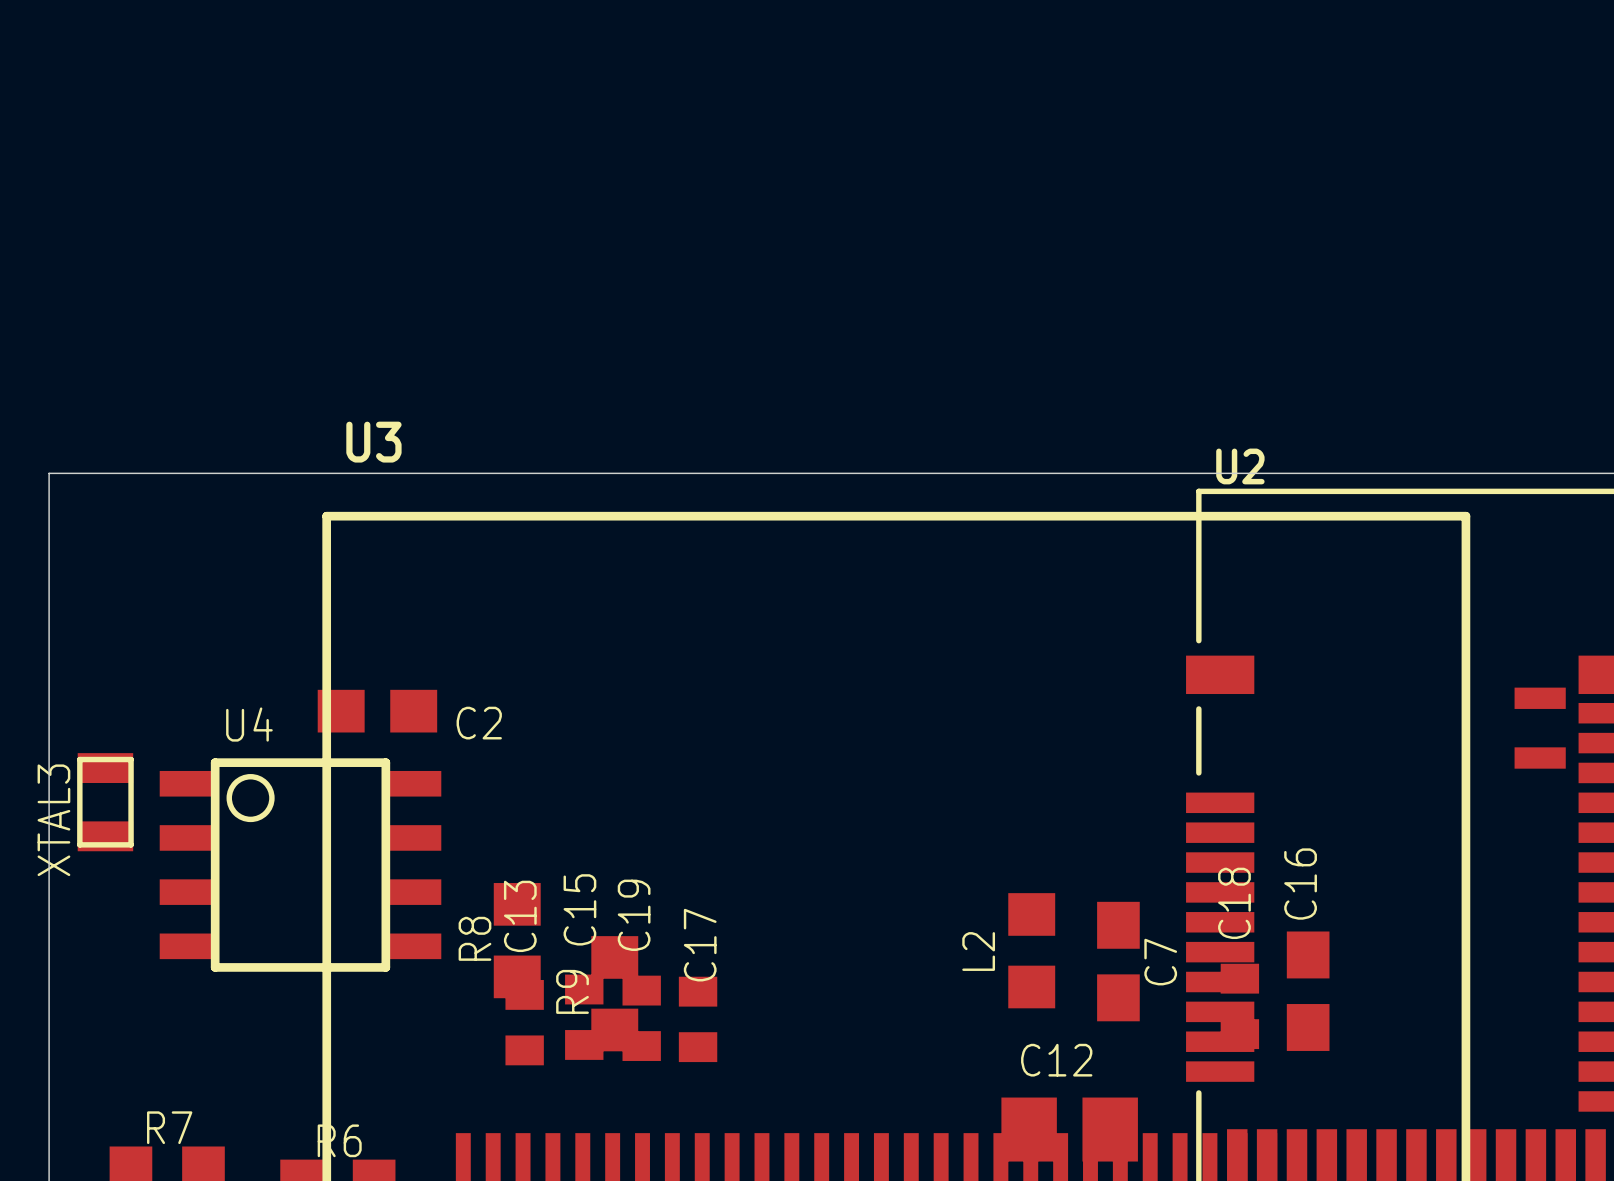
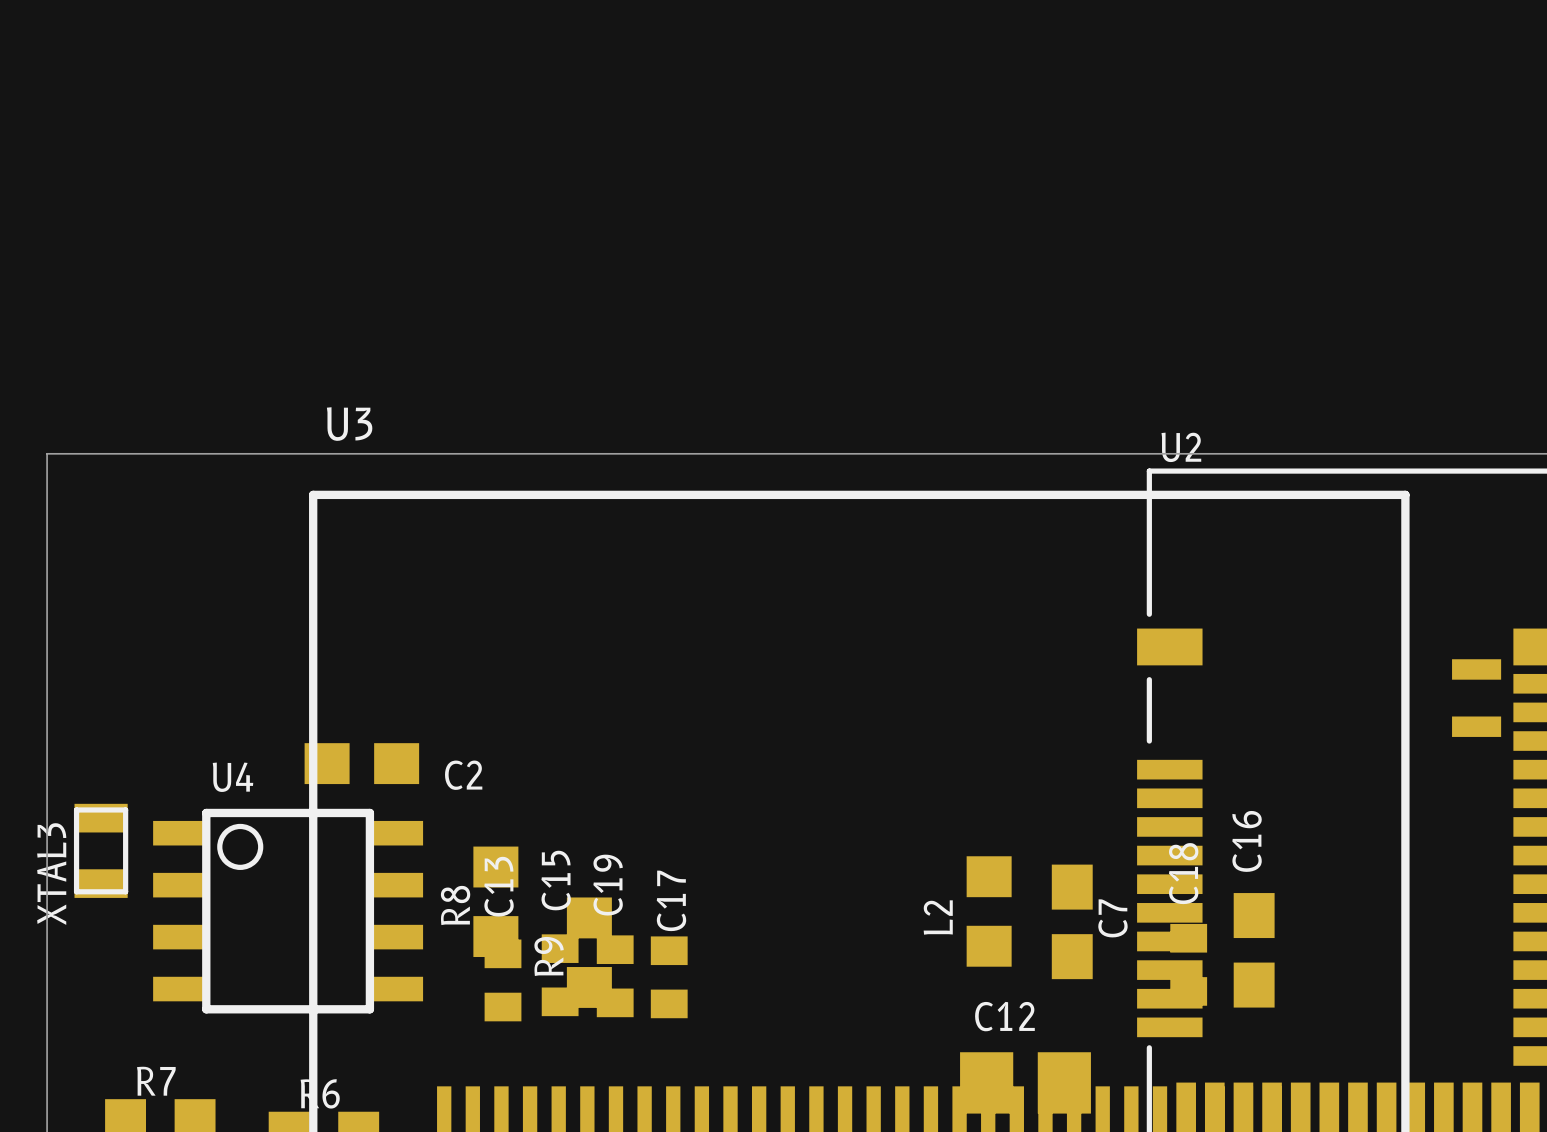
C2 position: (377, 711) -> (361, 763)
XTAL3 position: (105, 802) -> (101, 850)
U4 position: (300, 865) -> (288, 911)

